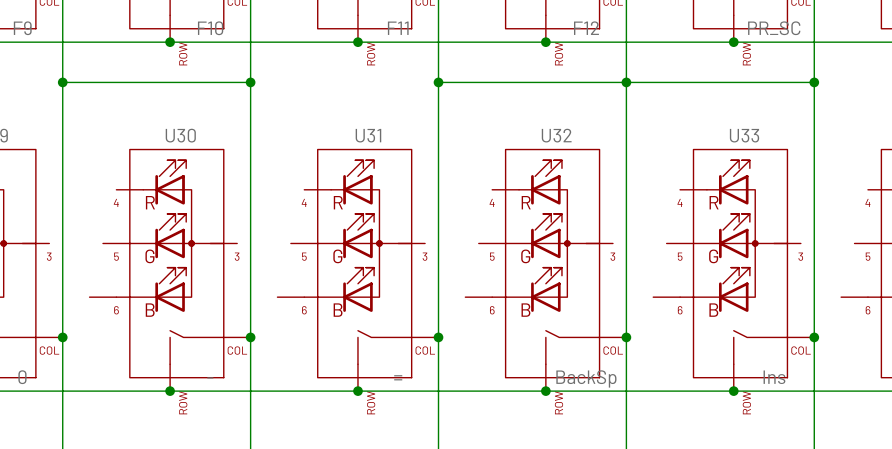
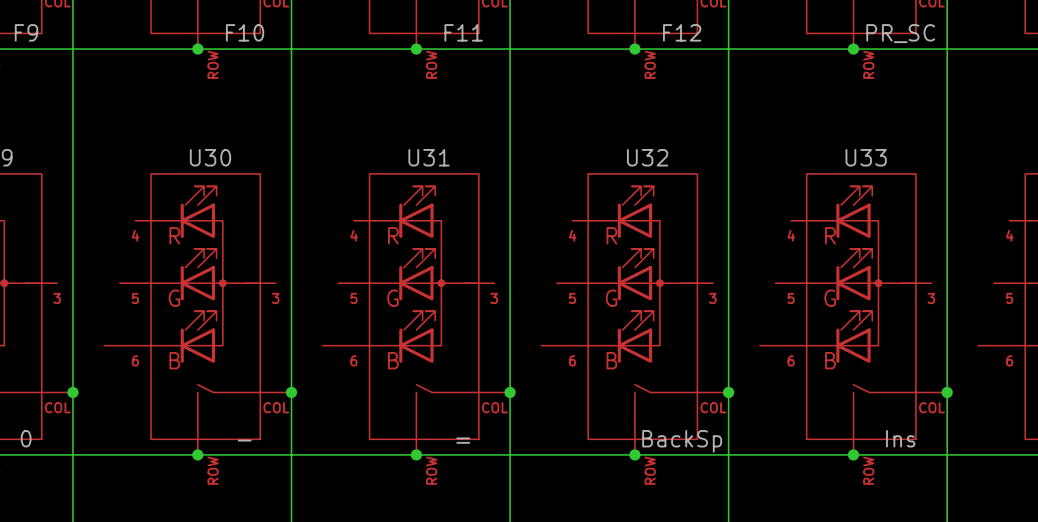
wire: (62, 82) (250, 82) -> none
junction: (62, 82) -> none
junction: (250, 82) -> none
wire: (438, 82) (814, 82) -> none
junction: (438, 82) -> none
junction: (626, 82) -> none
junction: (814, 82) -> none

